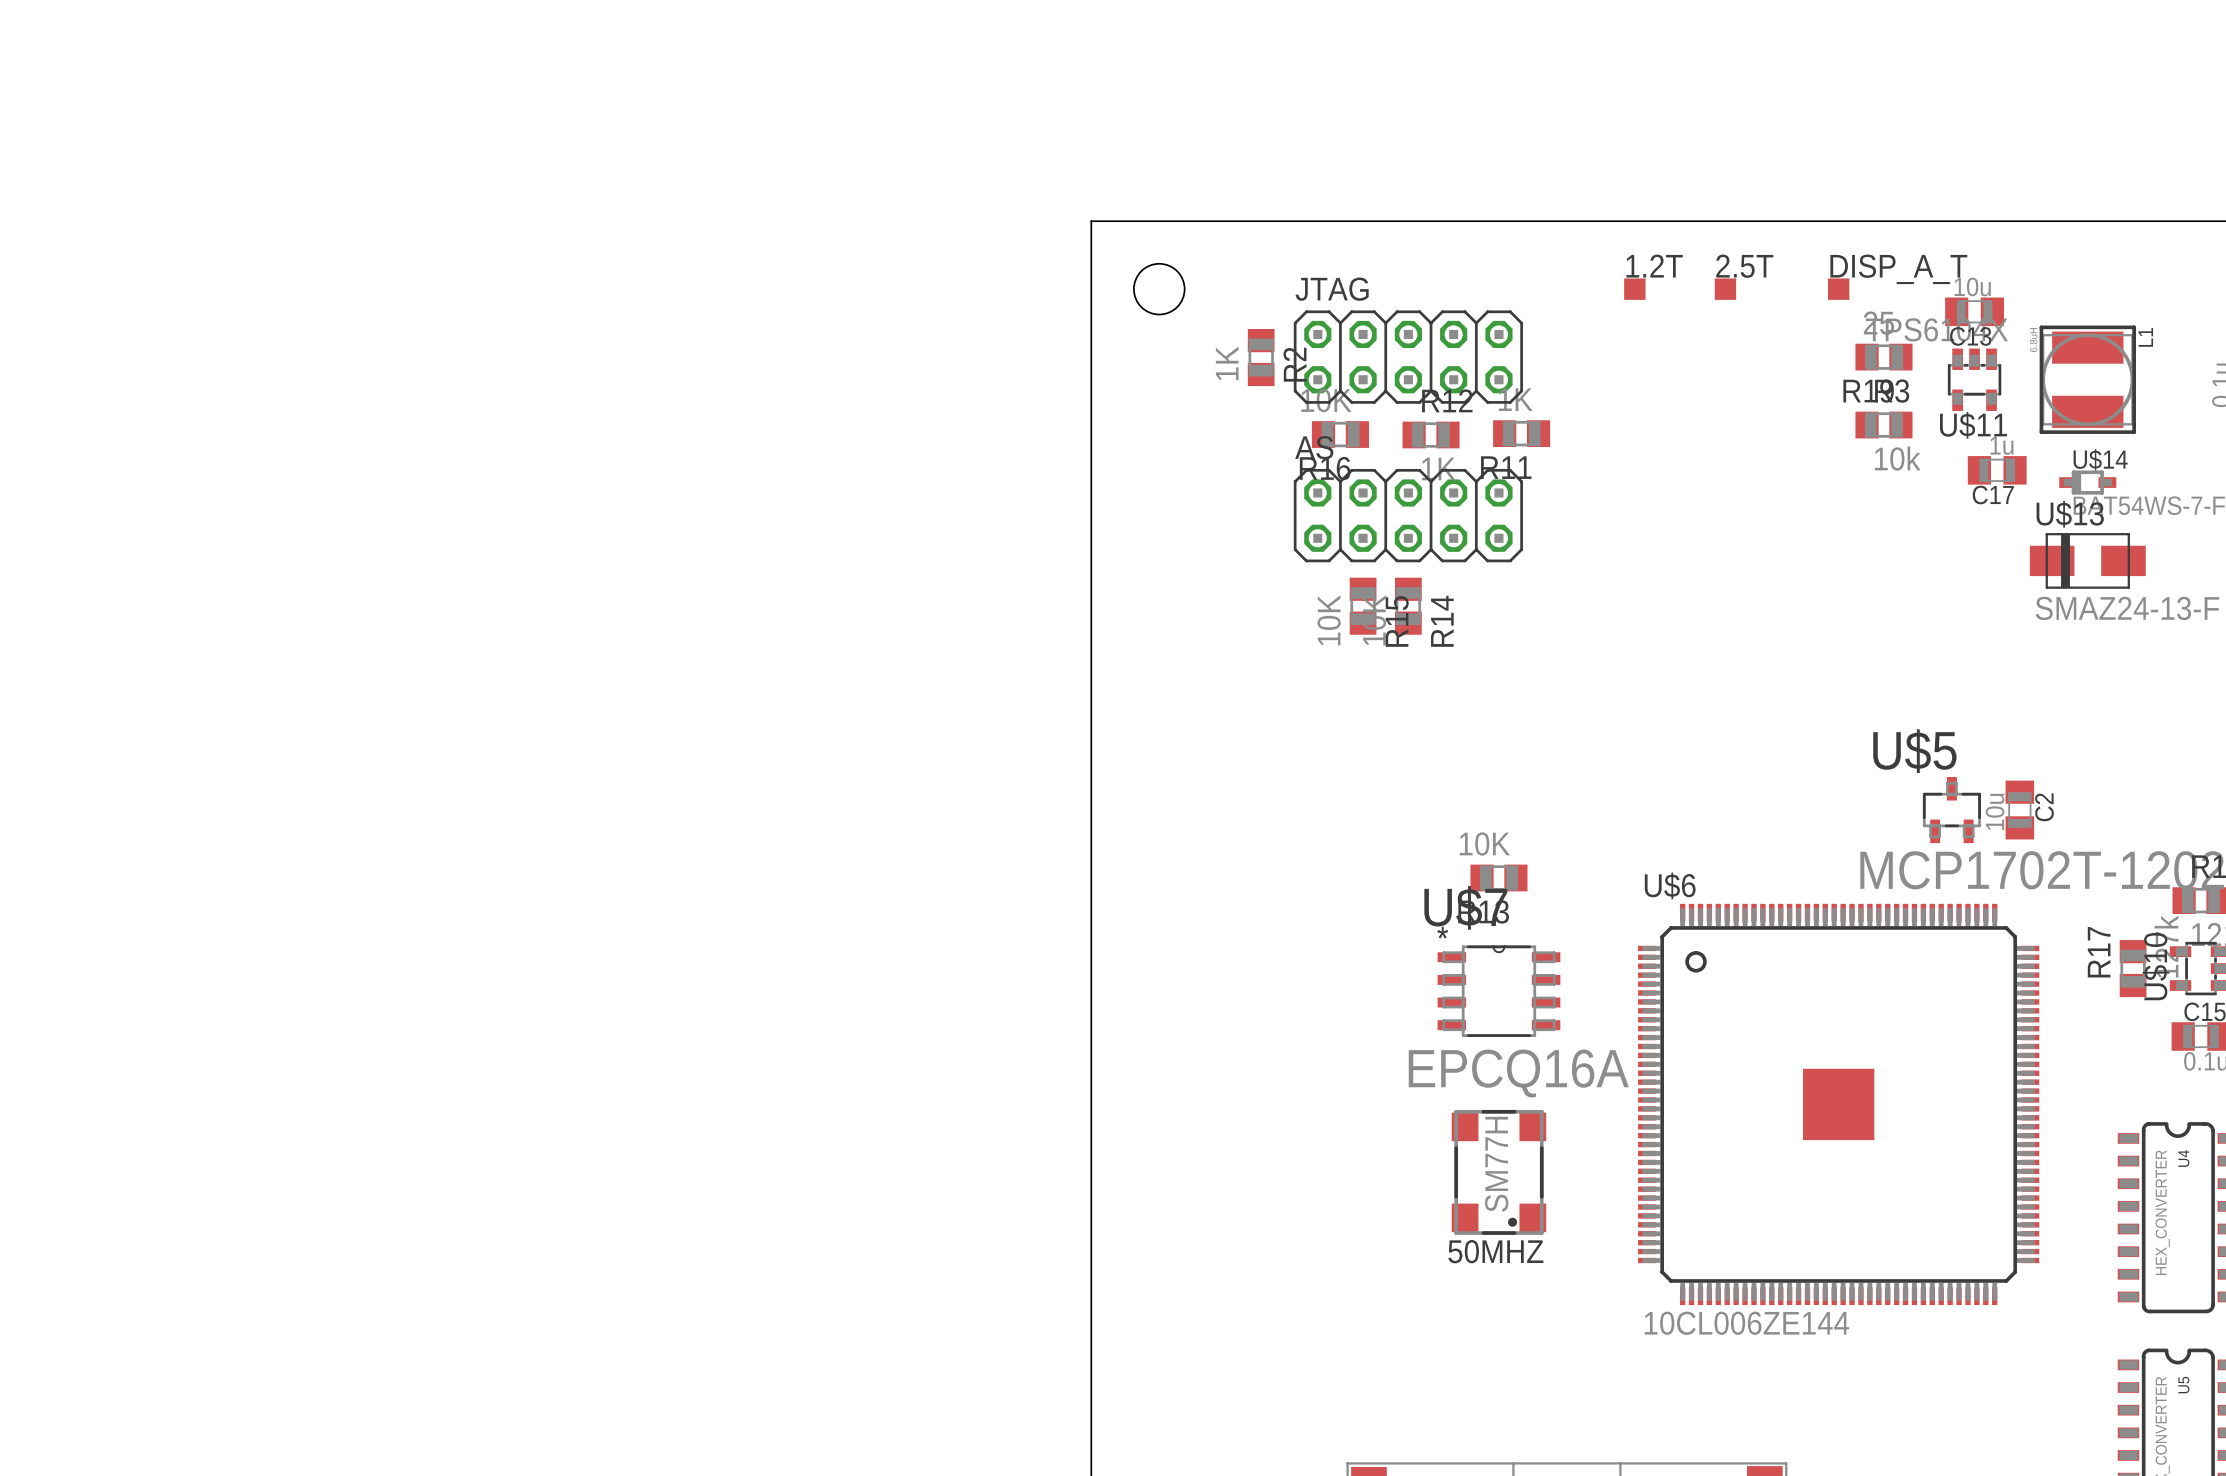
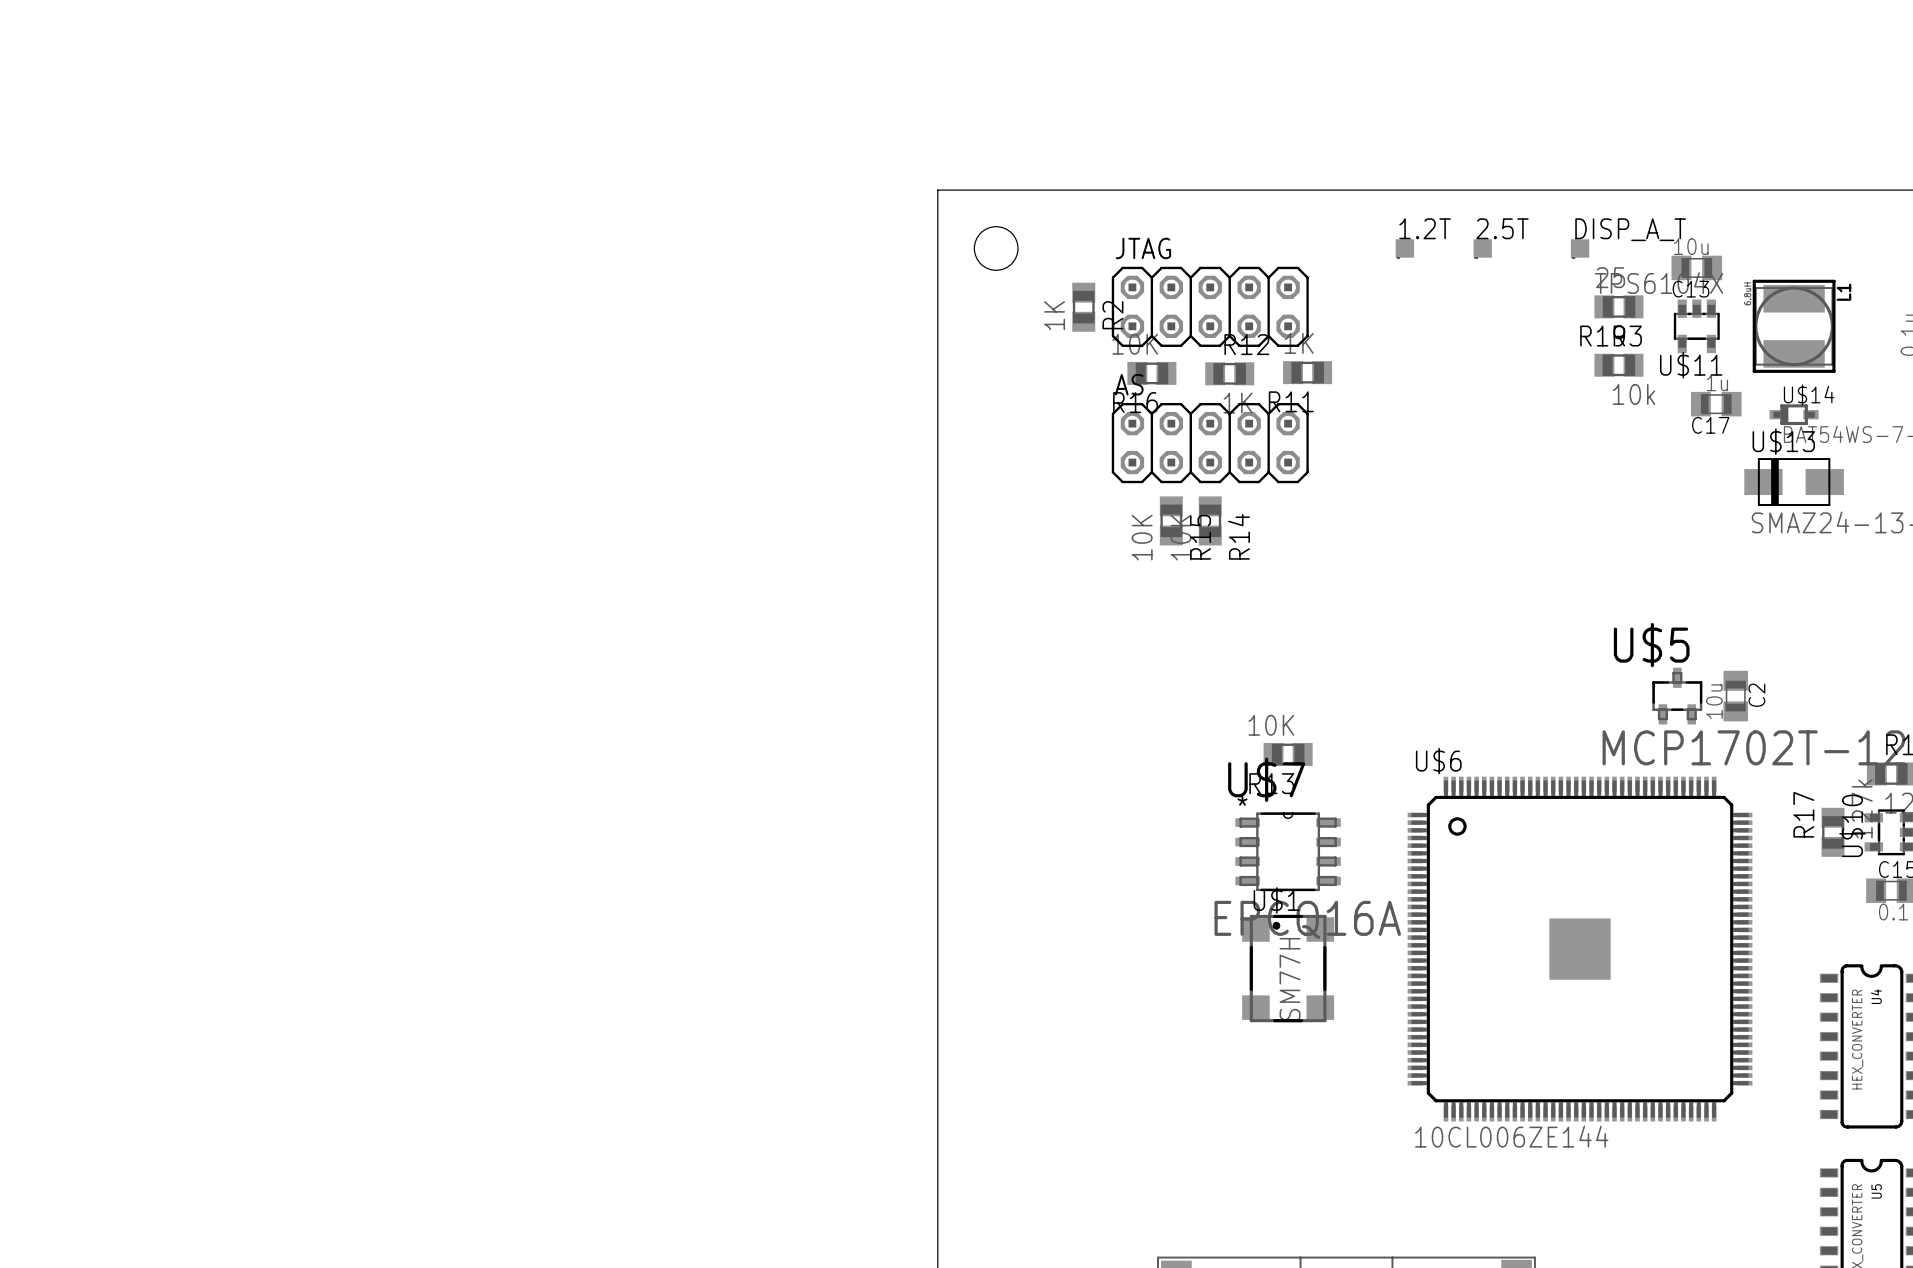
U$1: none -> SM77H (1288, 968)
50MHZ: SM77H (1498, 1172) -> none

